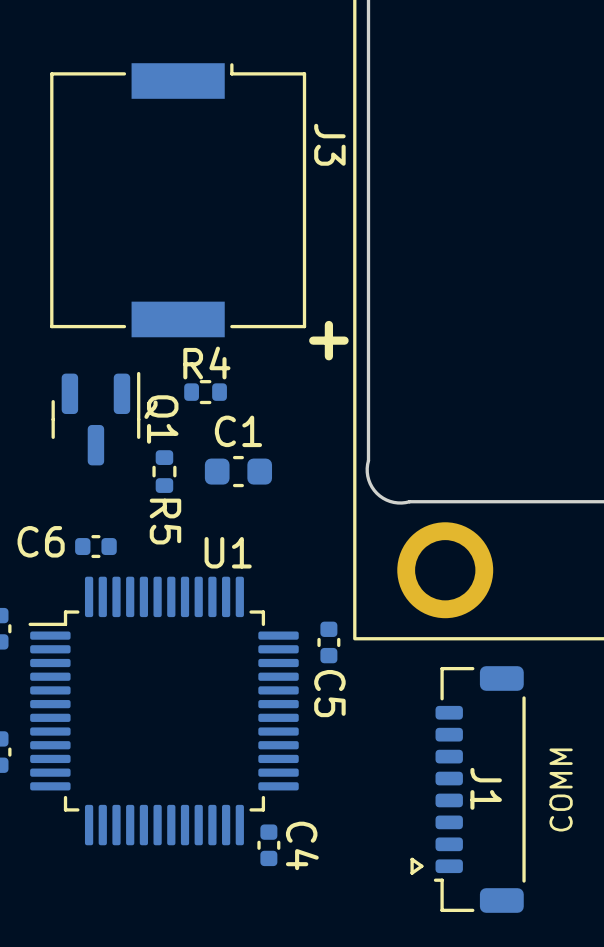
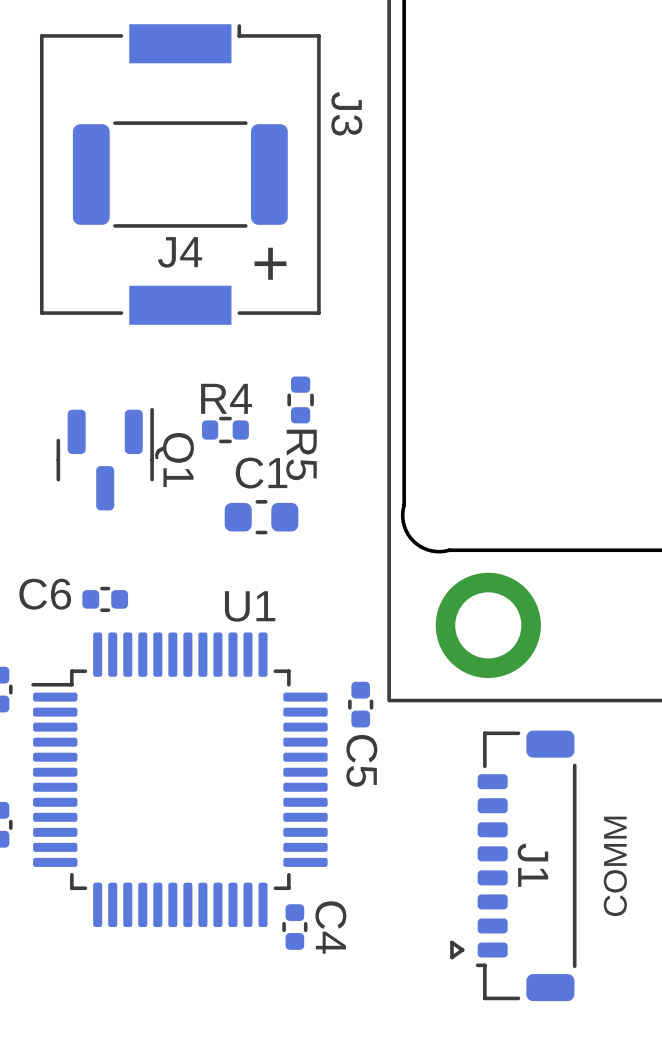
J4: none -> (180, 174)
J3 position: (178, 200) -> (180, 174)
text position: + (328, 340) -> + (270, 263)
R5 position: (164, 471) -> (300, 399)

